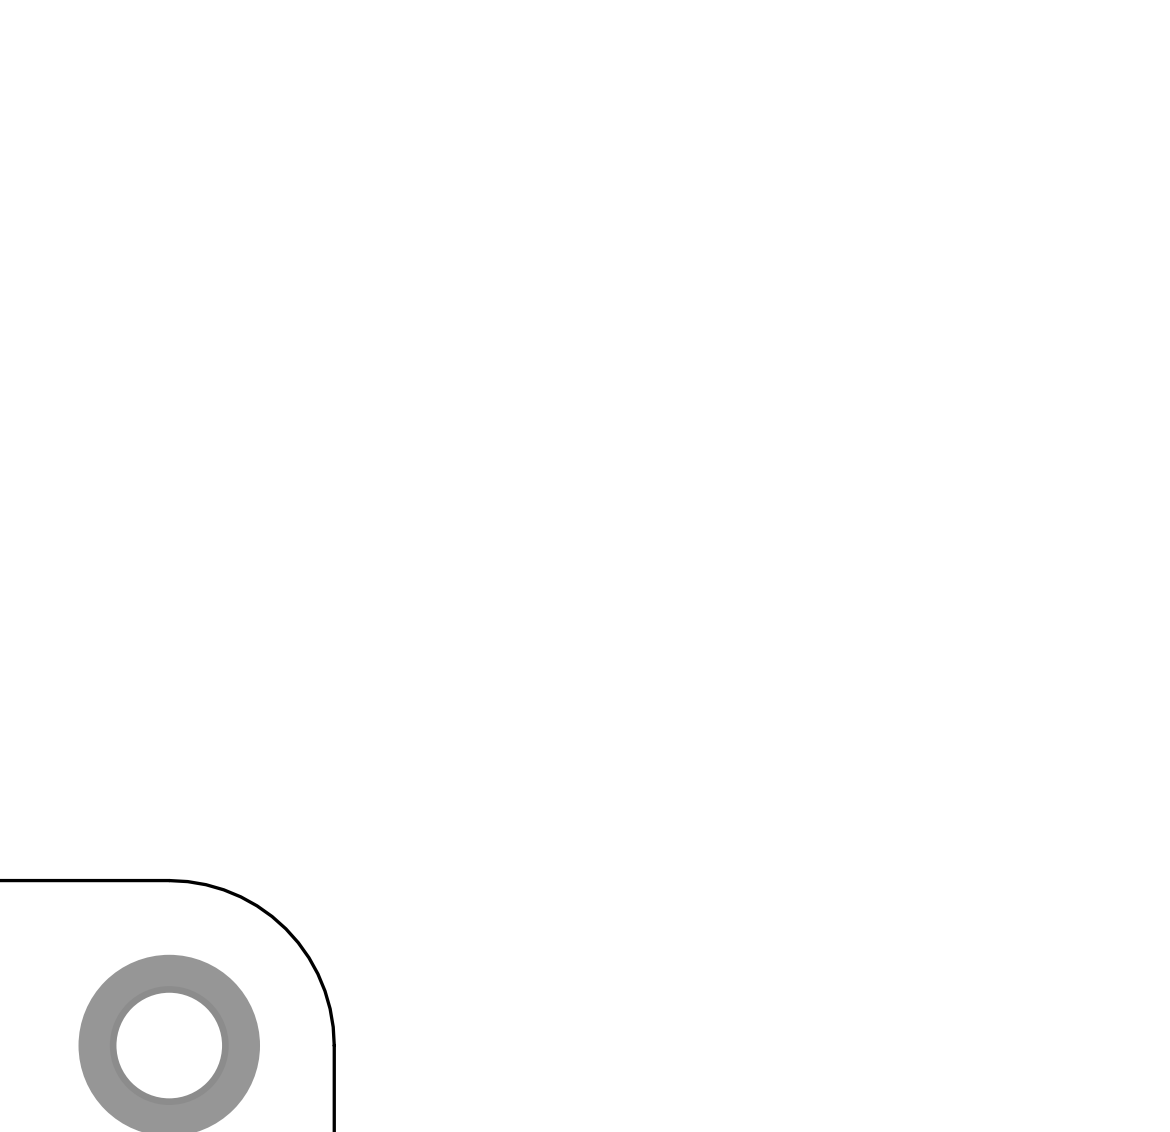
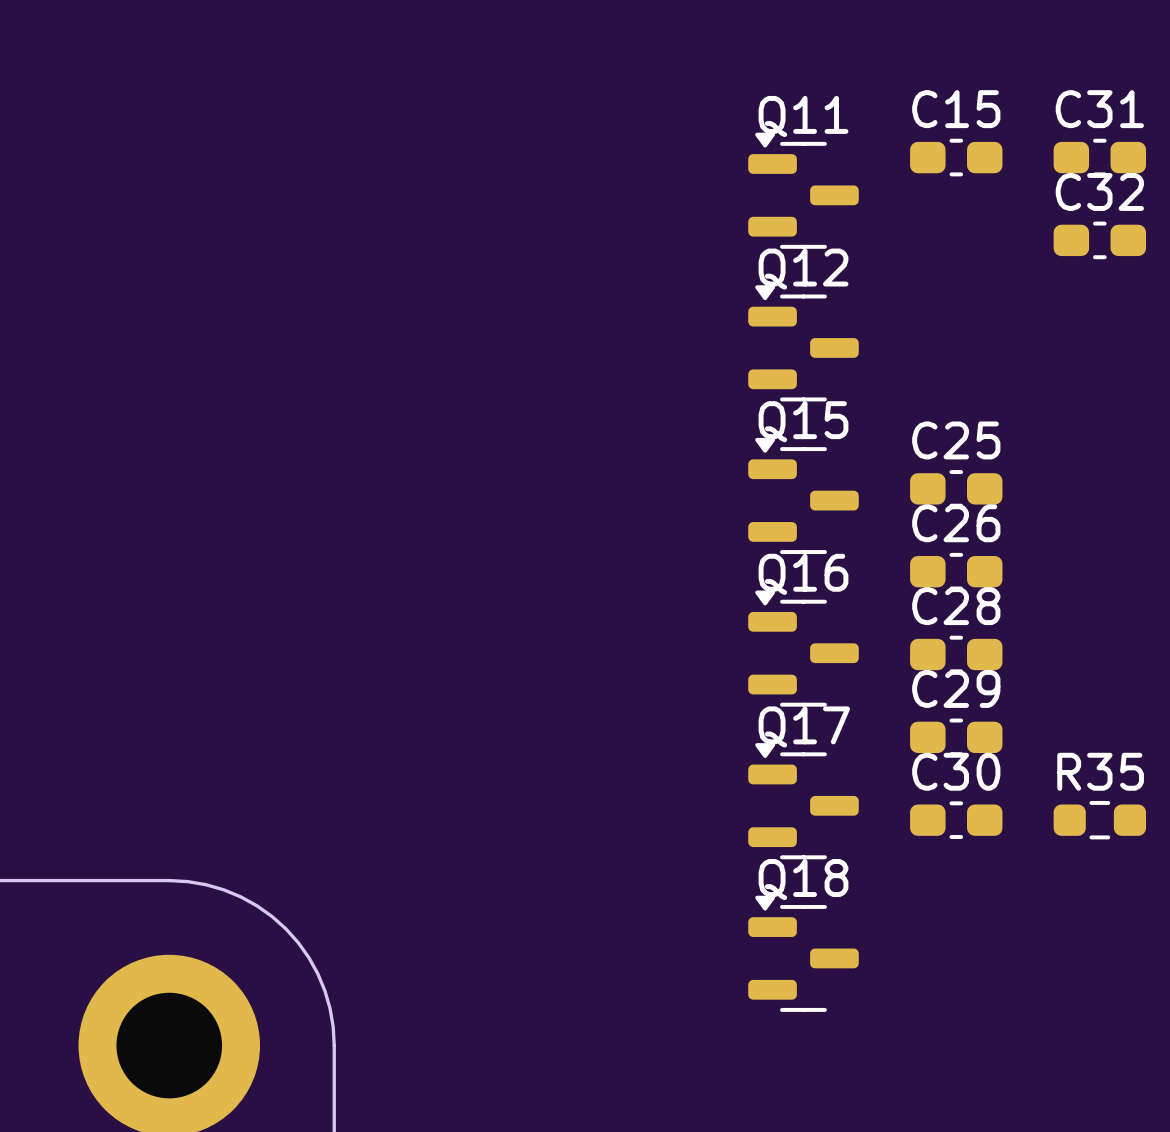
C15: none -> (956, 157)
C31: none -> (1099, 157)
Q11: none -> (803, 190)
C32: none -> (1099, 240)
Q12: none -> (803, 343)
C25: none -> (956, 488)
Q15: none -> (803, 495)
C26: none -> (956, 571)
Q16: none -> (803, 648)
C28: none -> (956, 654)
C29: none -> (956, 737)
Q17: none -> (803, 801)
C30: none -> (956, 820)
R35: none -> (1099, 820)
Q18: none -> (803, 953)

